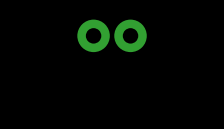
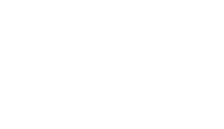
part: (112, 35) -> none

